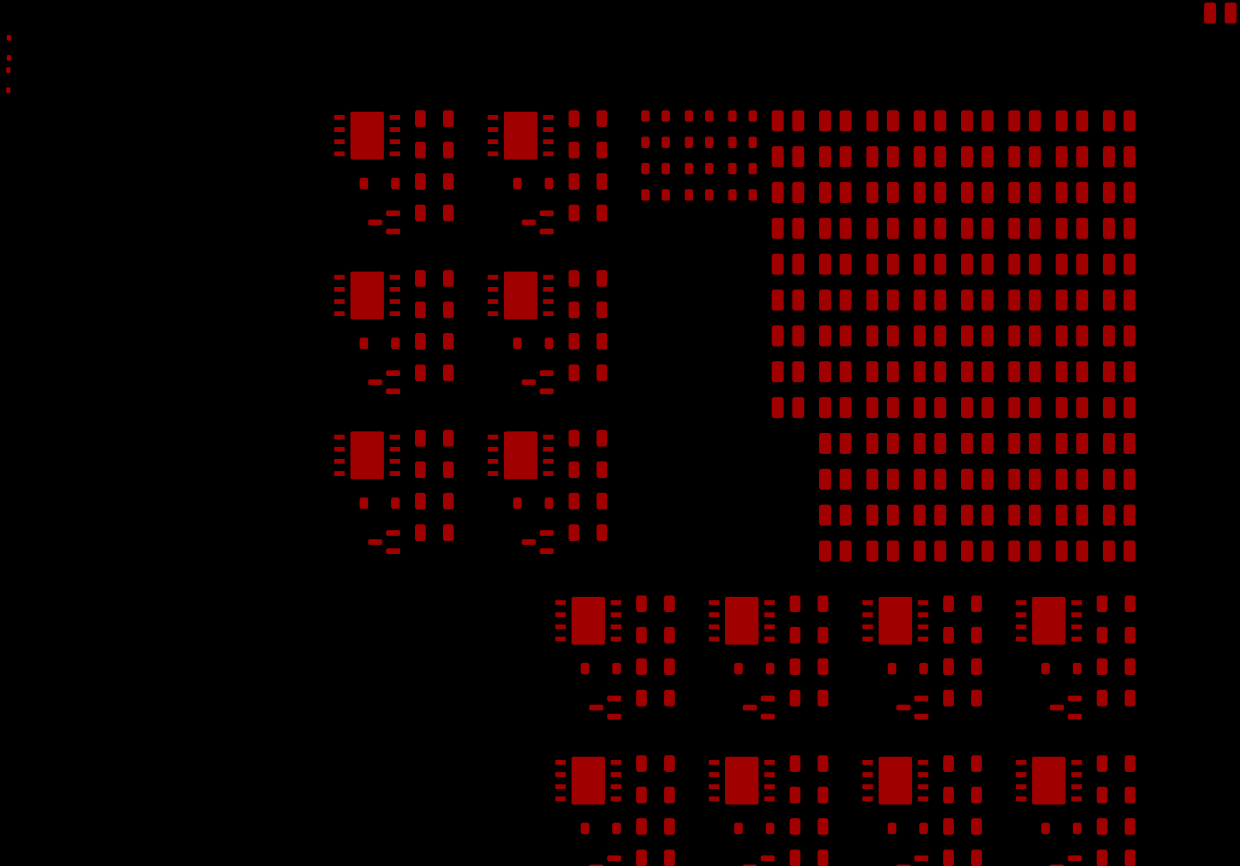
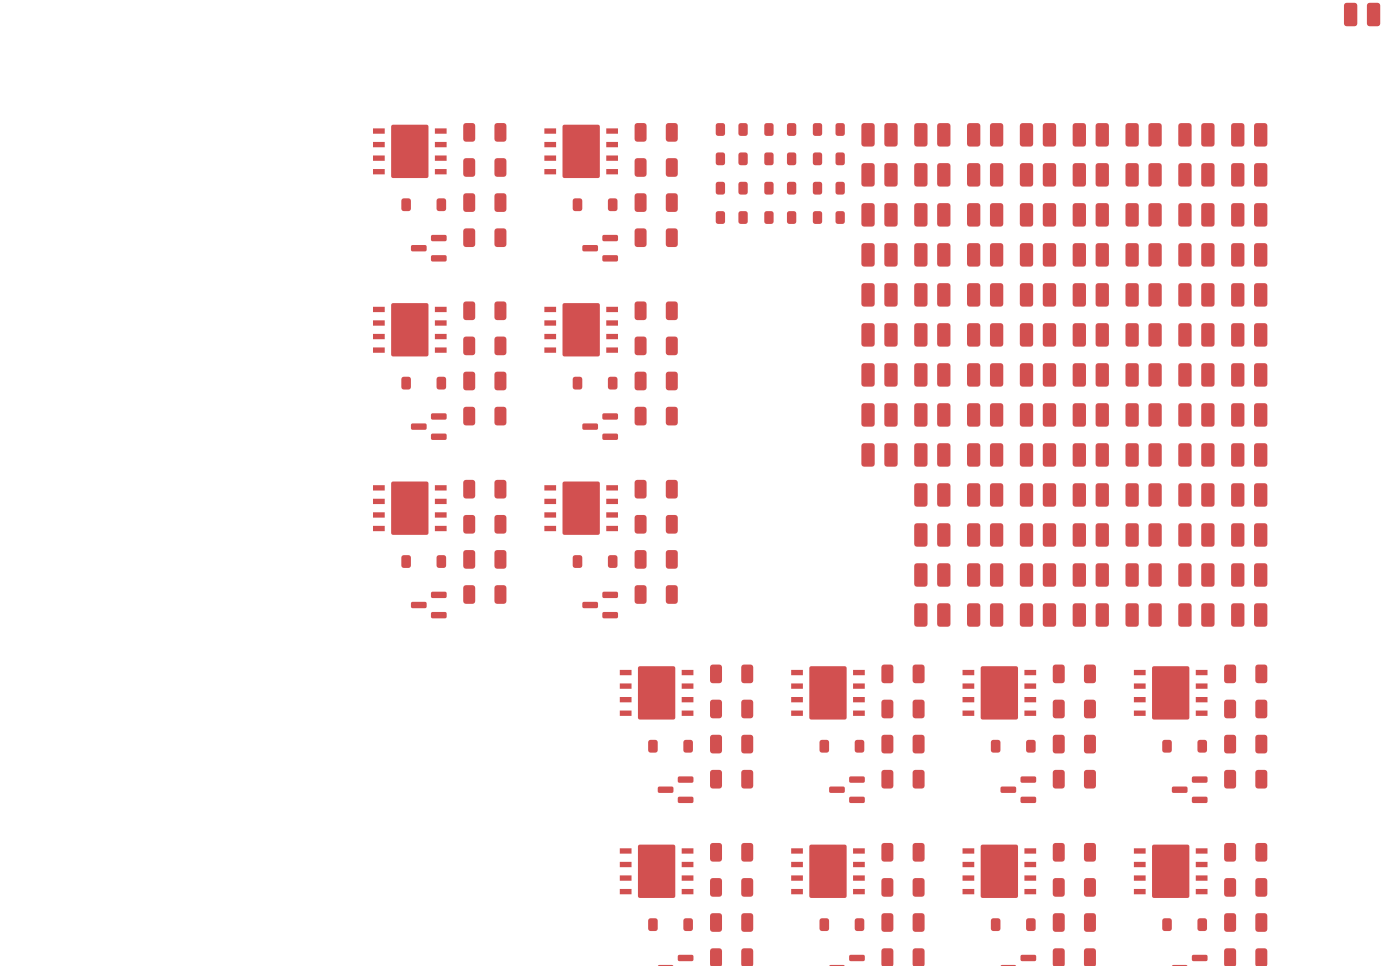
part: (8, 47) -> none
part: (8, 80) -> none

